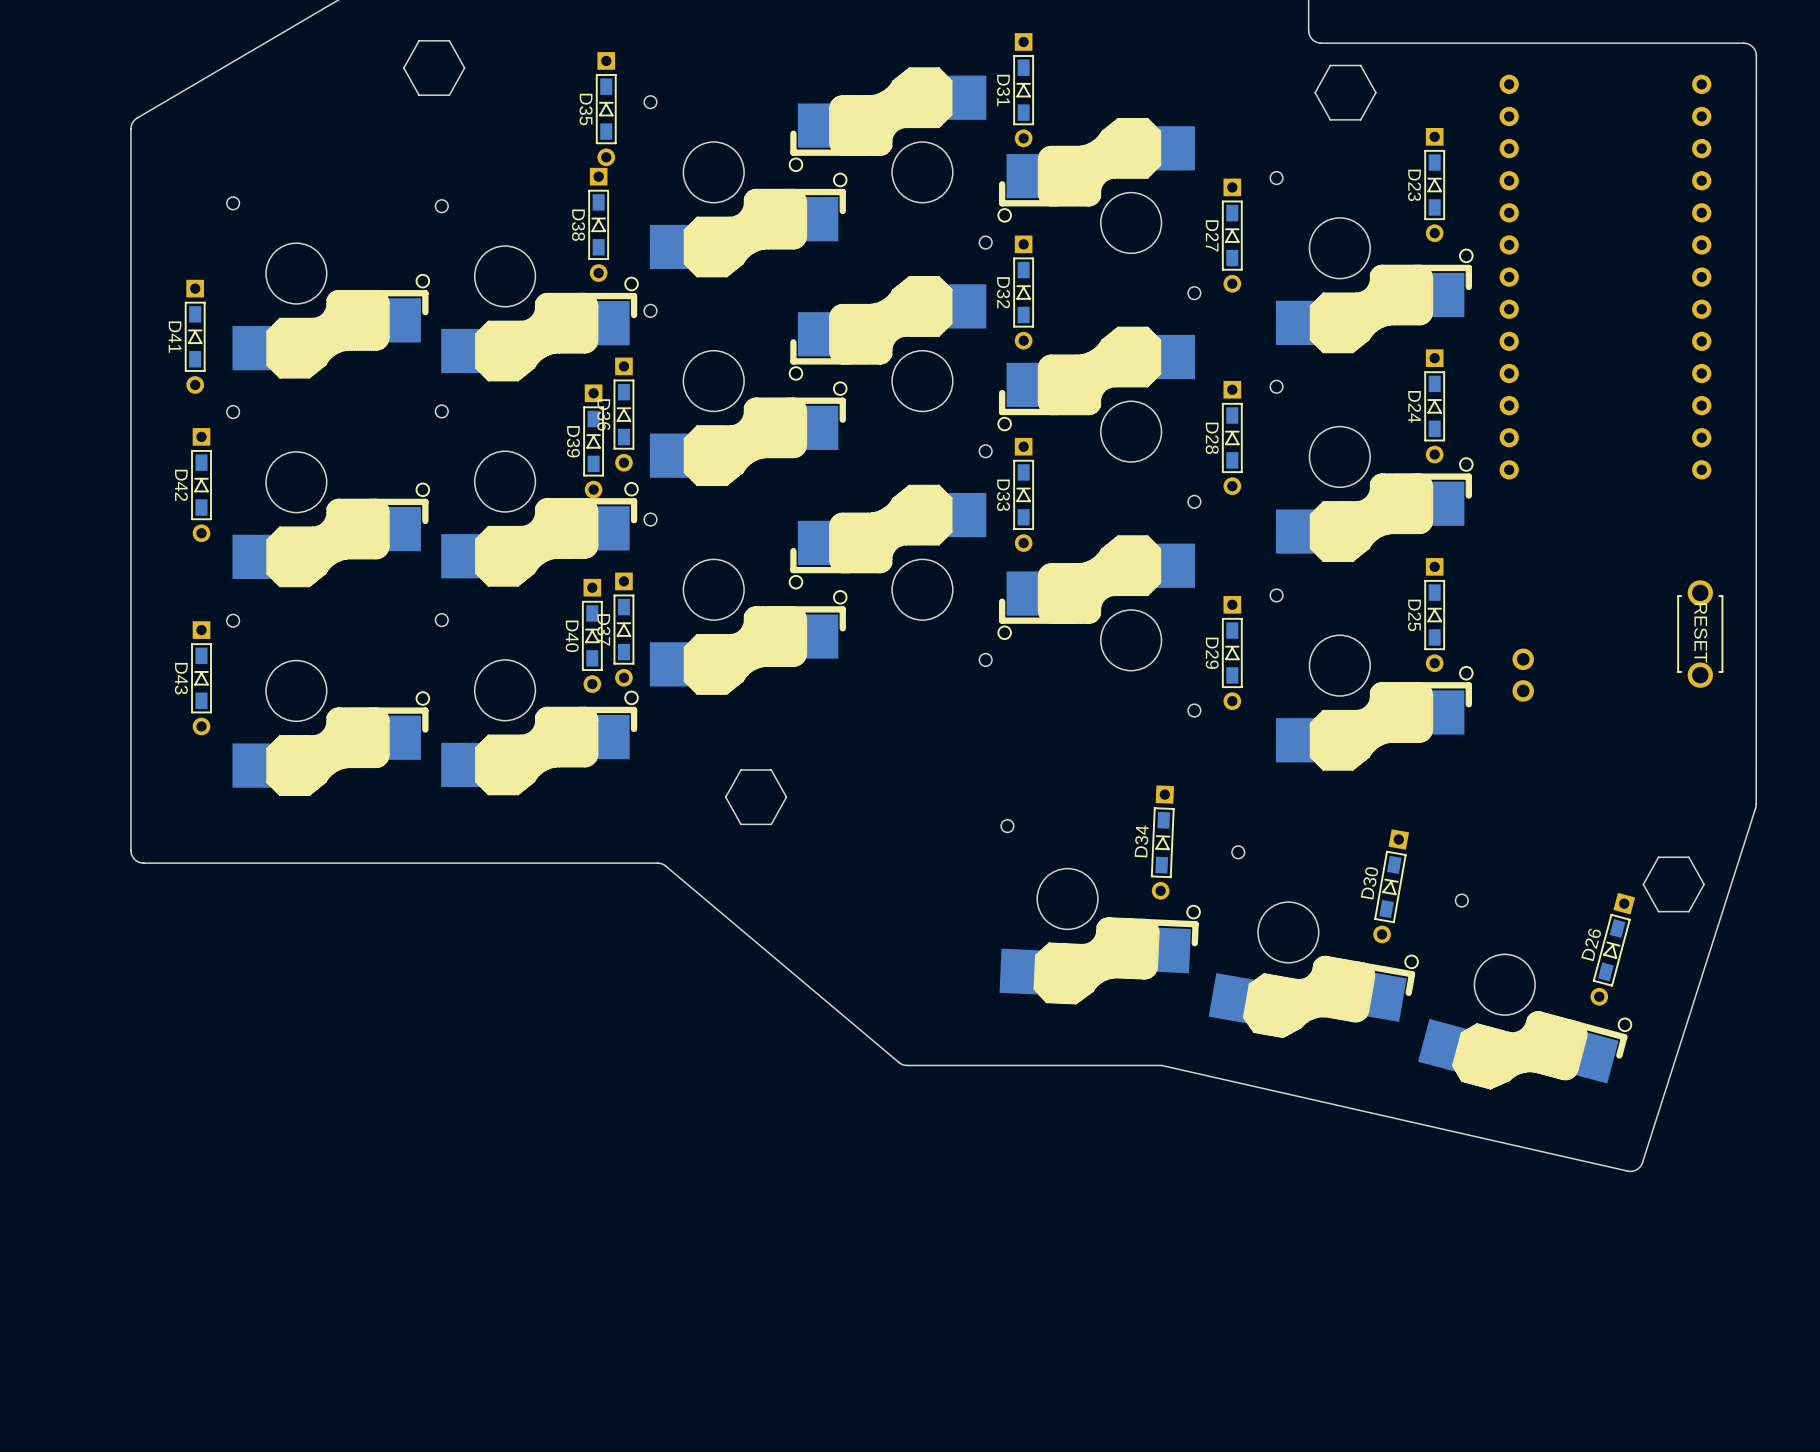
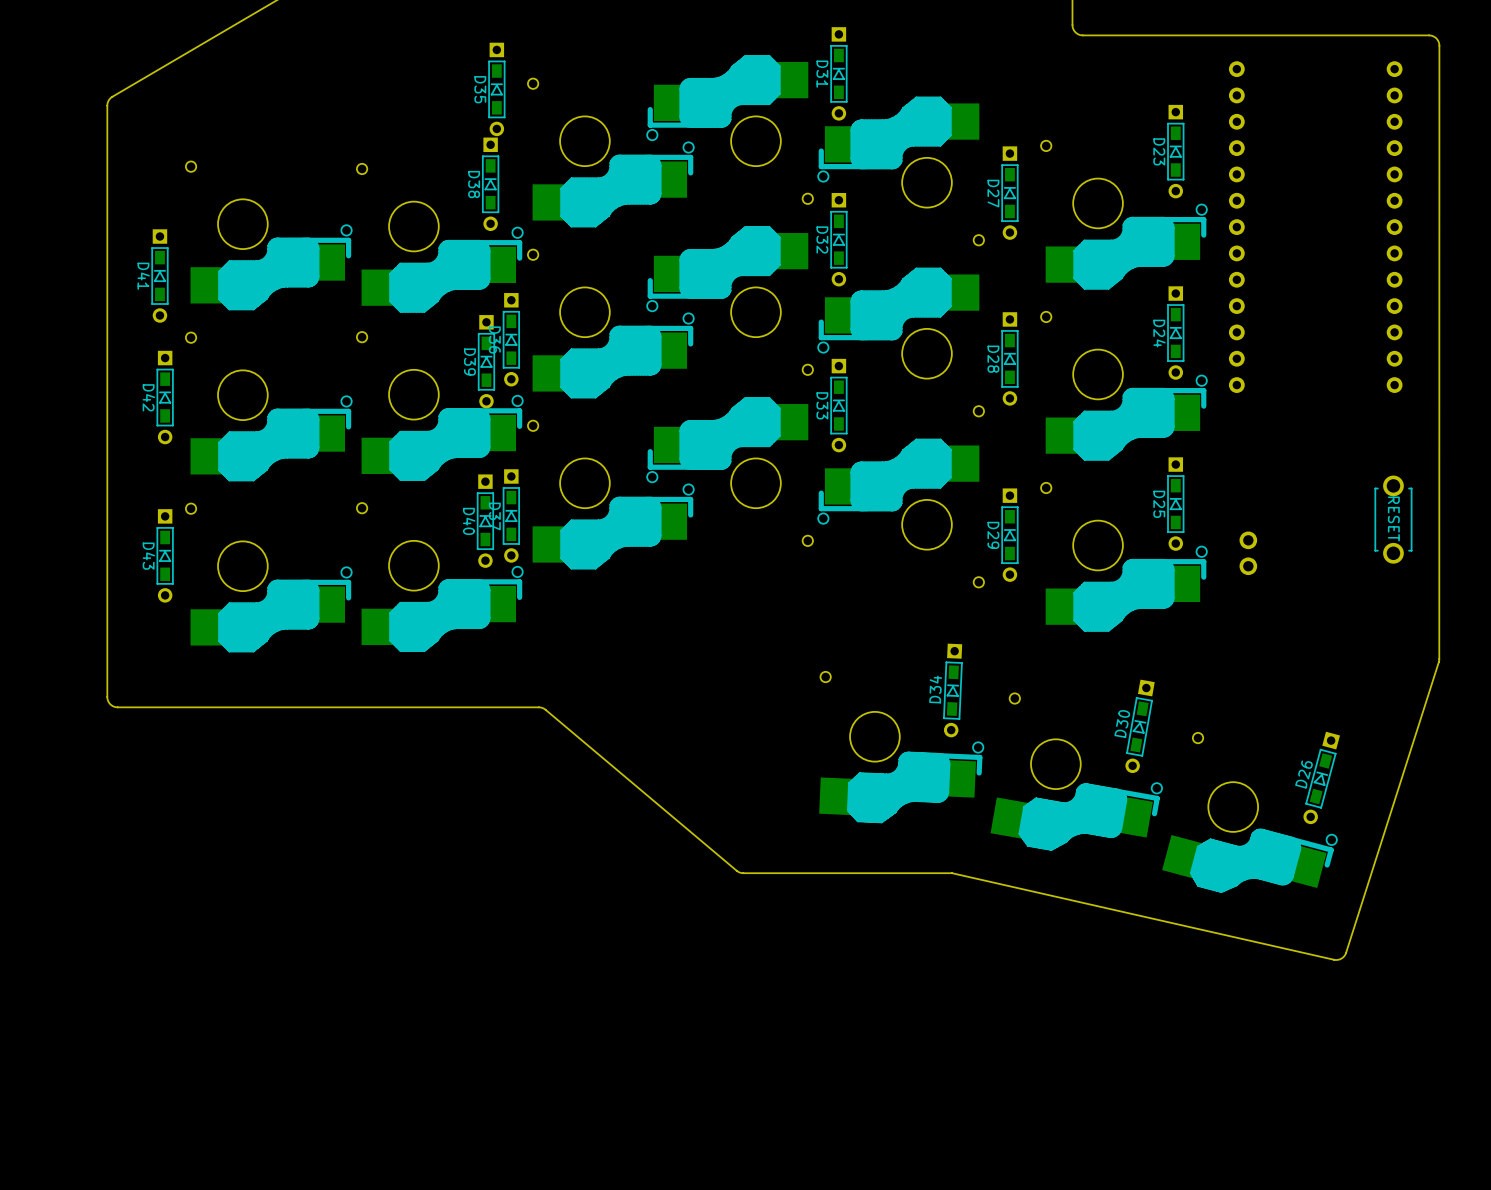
drawing: [403, 40, 466, 96] -> none
drawing: [1314, 64, 1377, 121] -> none
drawing: [725, 769, 788, 826] -> none
drawing: [1642, 856, 1705, 913] -> none

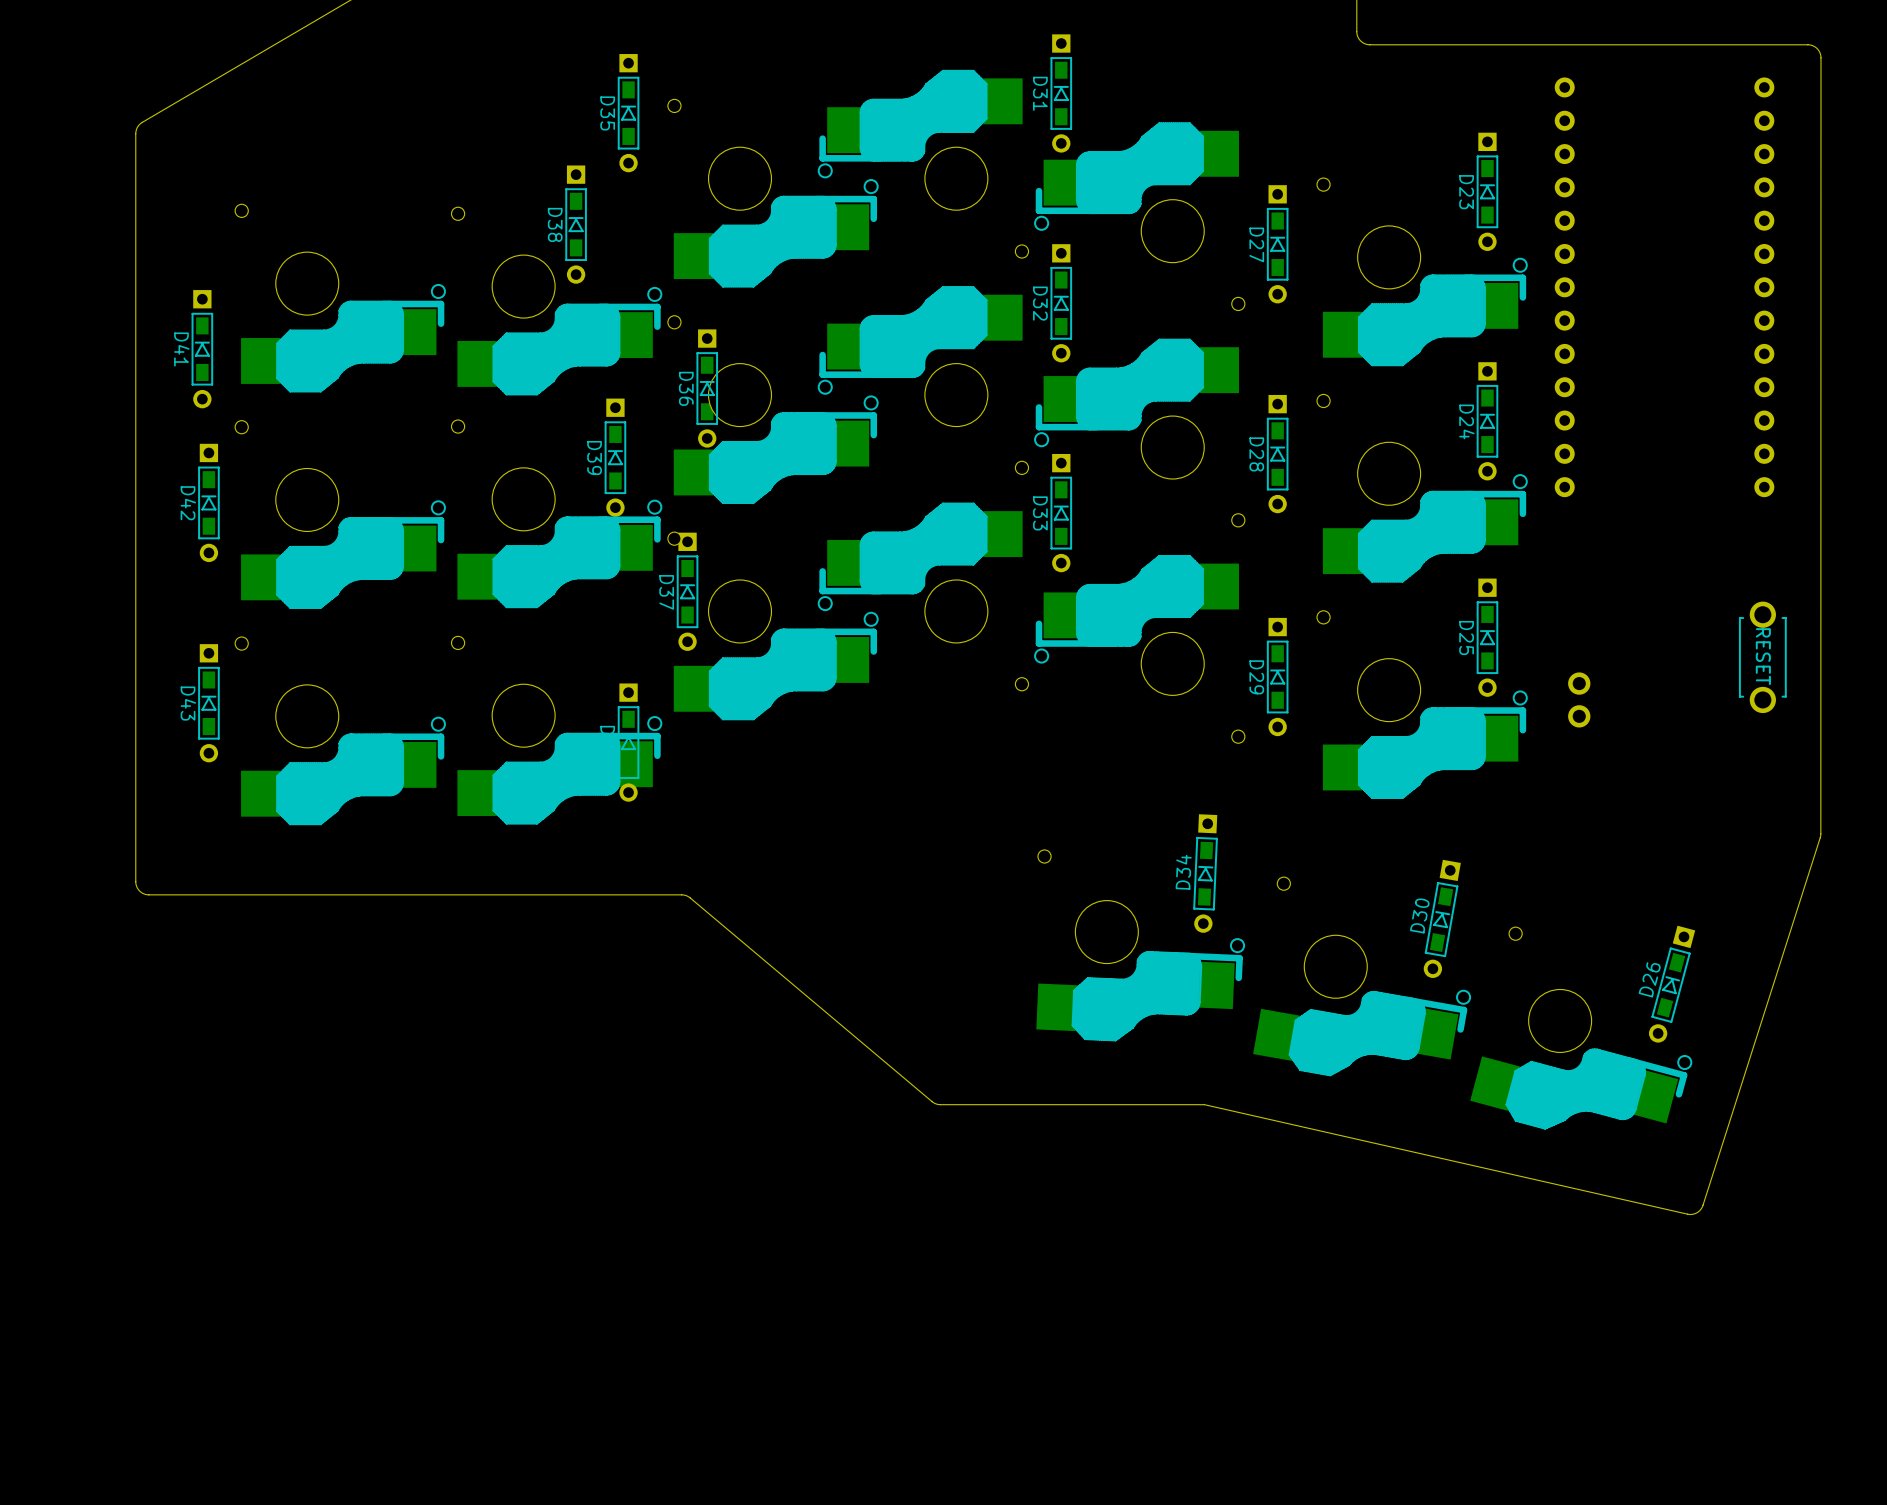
D38 position: (490, 184) -> (576, 224)
D36 position: (511, 339) -> (707, 388)
D37 position: (511, 515) -> (687, 591)
D40 position: (485, 521) -> (628, 742)

